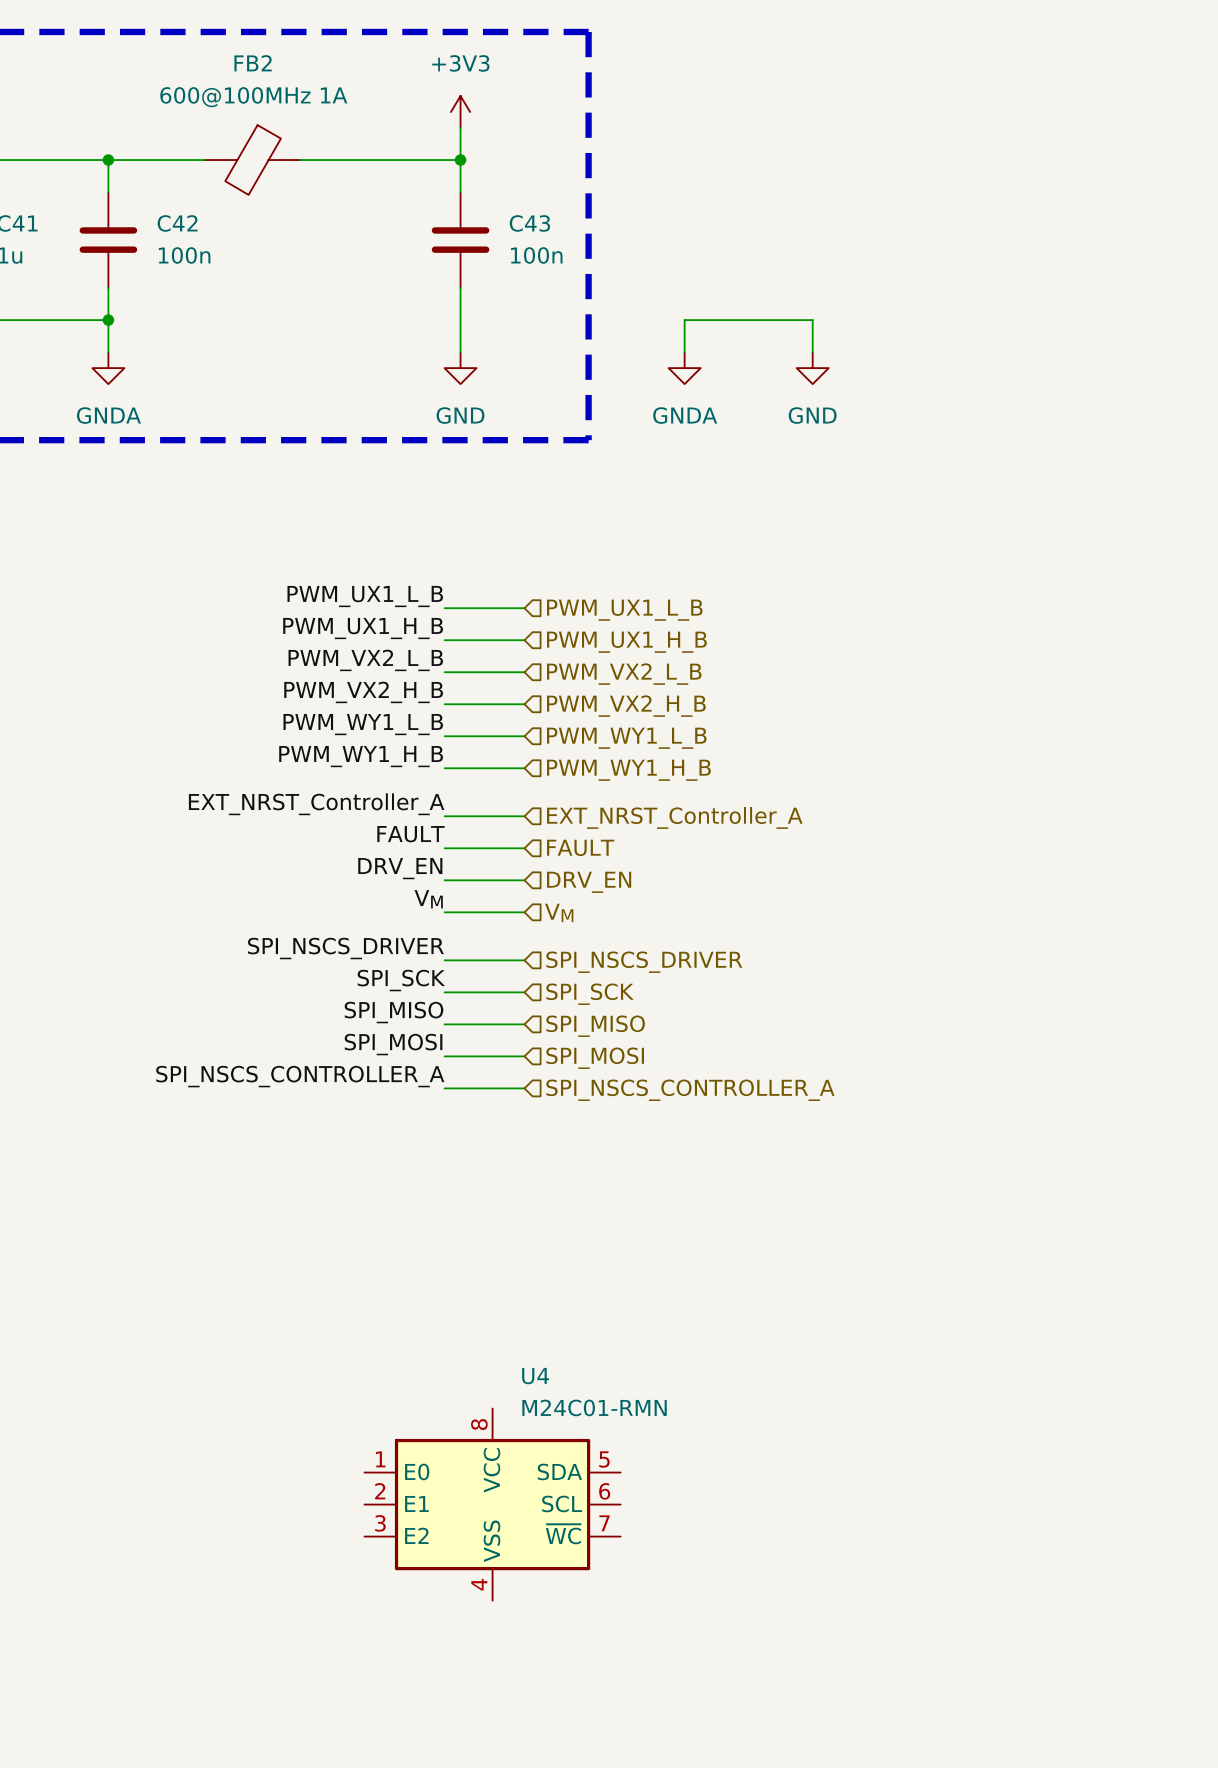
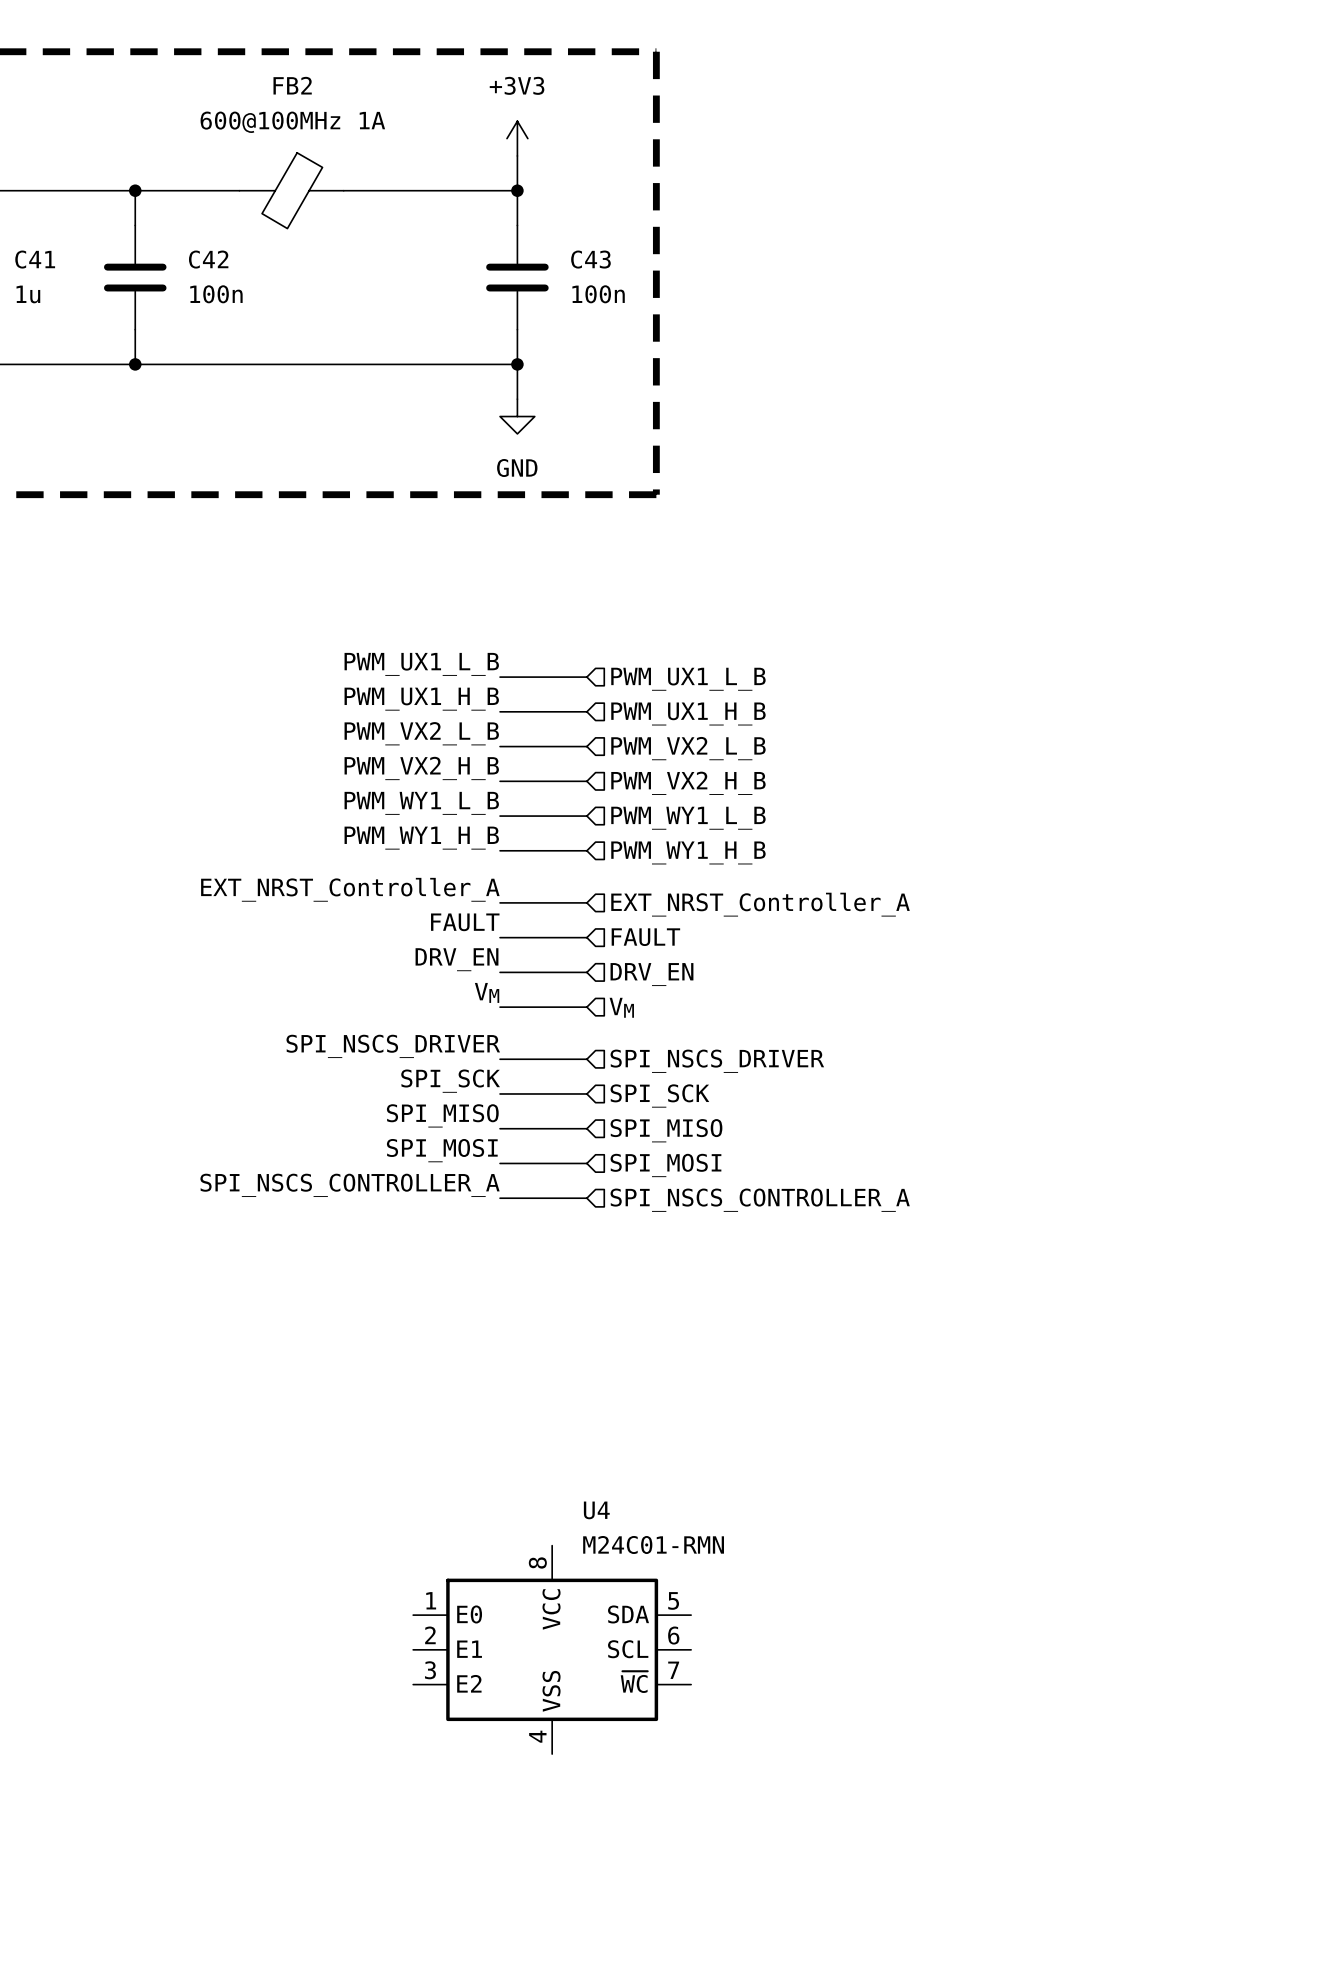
wire: (108, 320) (108, 352) -> (135, 364) (517, 364)
junction: none -> (517, 364)
wire: (684, 352) (684, 320) (812, 320) (812, 352) -> none
power symbol: GNDA (108, 368) -> none
power symbol: GNDA (684, 368) -> none
power symbol: GND (812, 368) -> none

